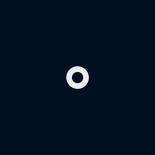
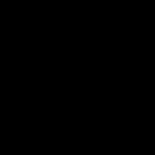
via: (77, 77) -> none

